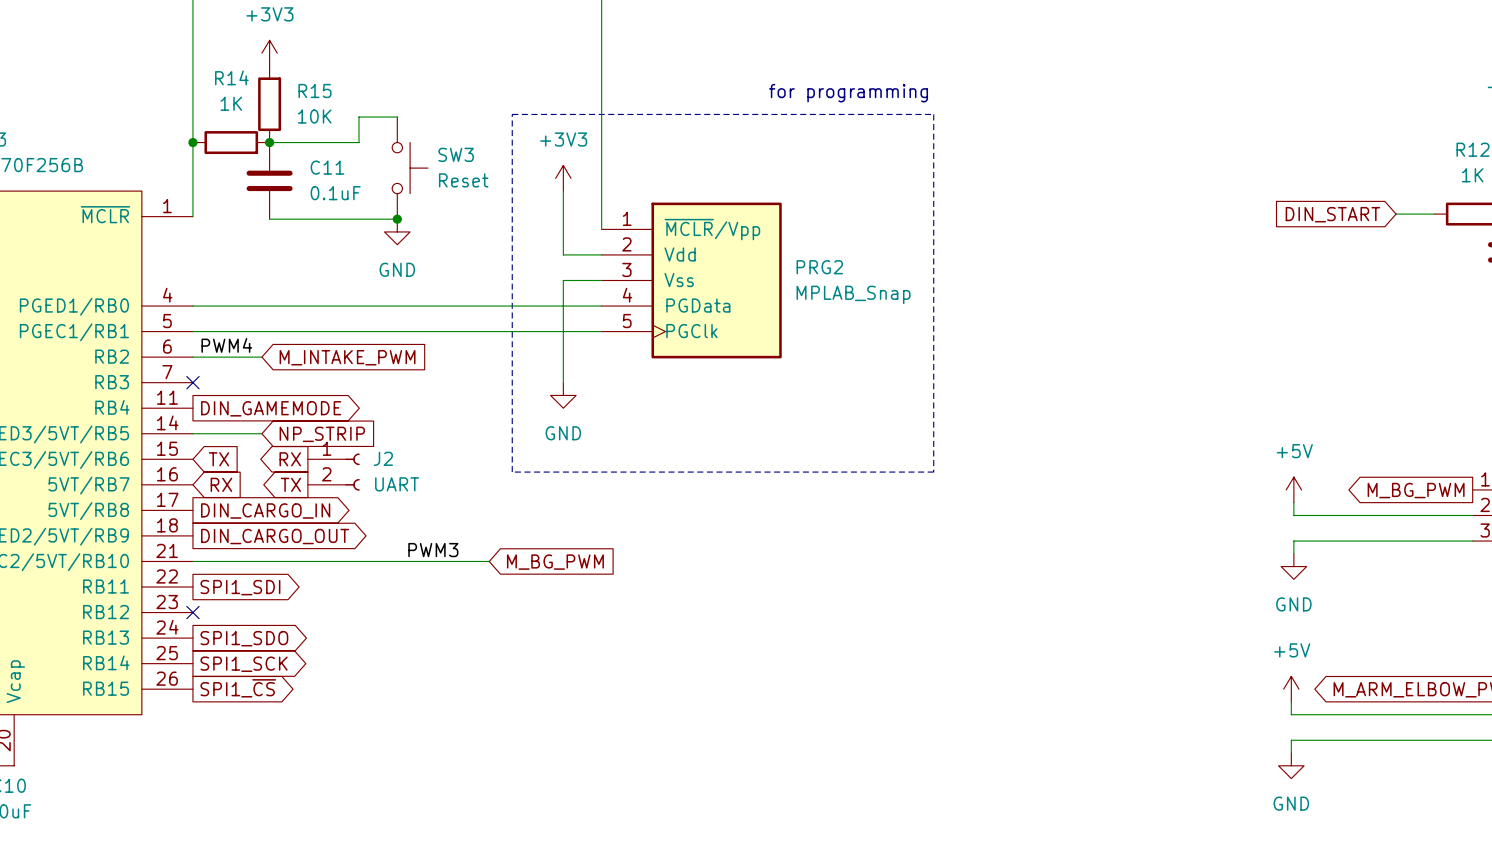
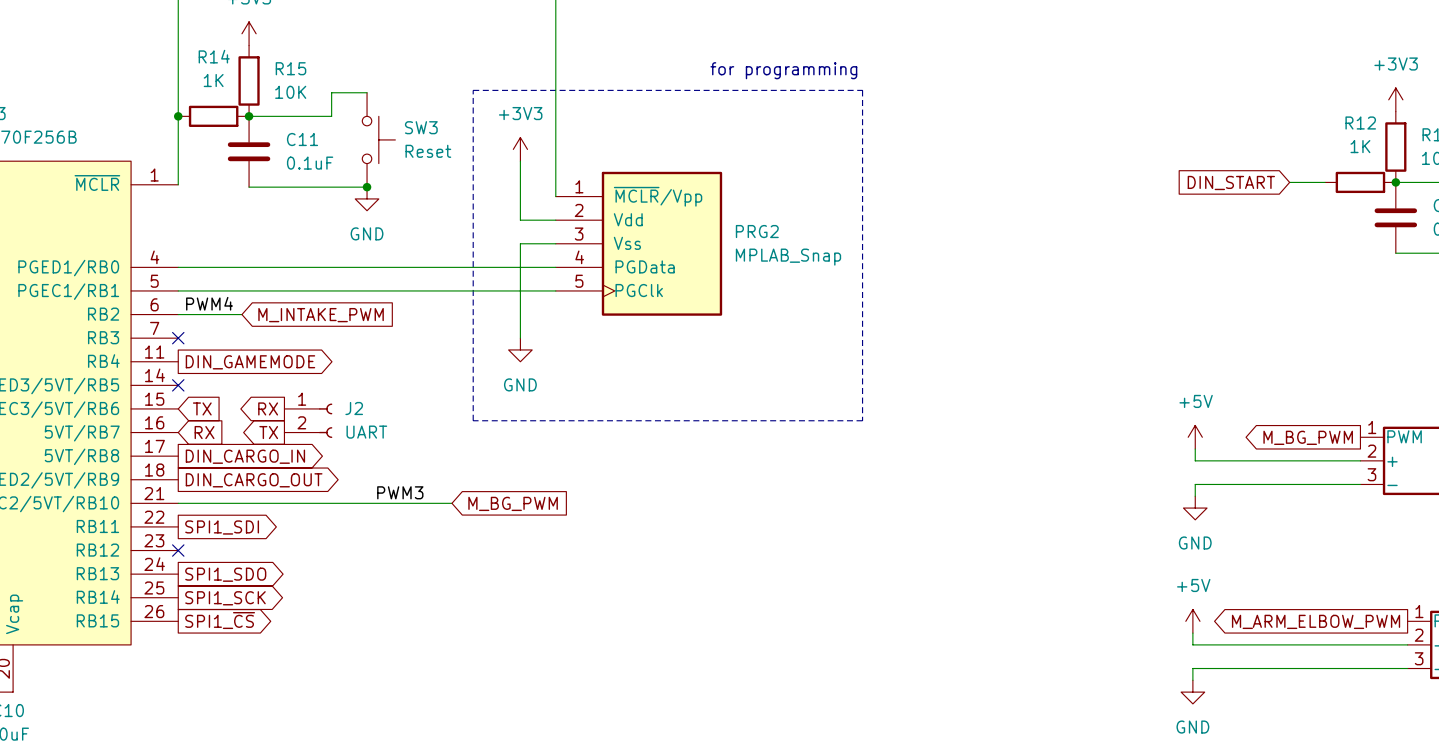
wire: (192, 433) (261, 433) -> none
no-connect mark: none -> (178, 385)
global label: NP_STRIP (322, 434) -> none

